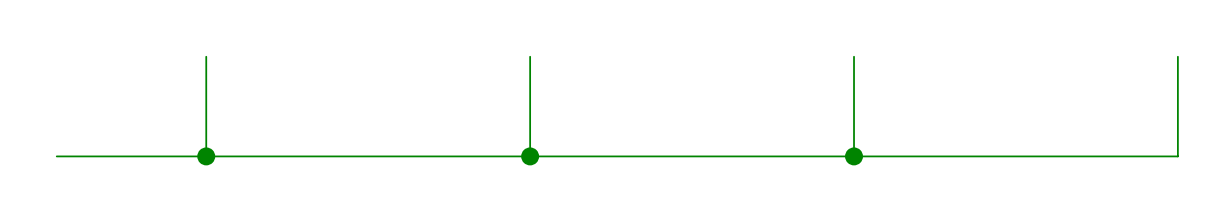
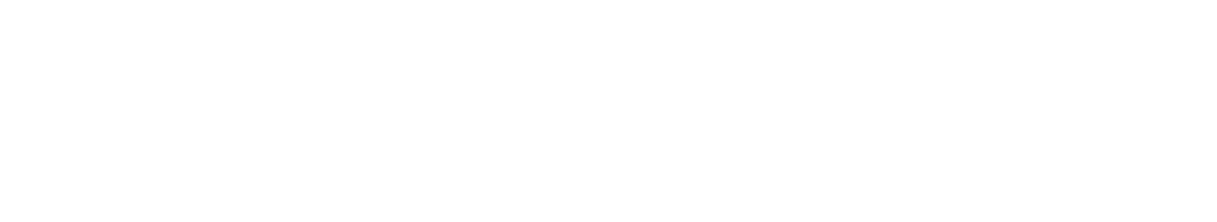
wire: (206, 56) (206, 156) -> none
wire: (530, 56) (530, 156) -> none
wire: (854, 56) (854, 156) -> none
wire: (1177, 56) (1177, 156) (56, 156) -> none
junction: (206, 156) -> none
junction: (530, 156) -> none
junction: (854, 156) -> none

